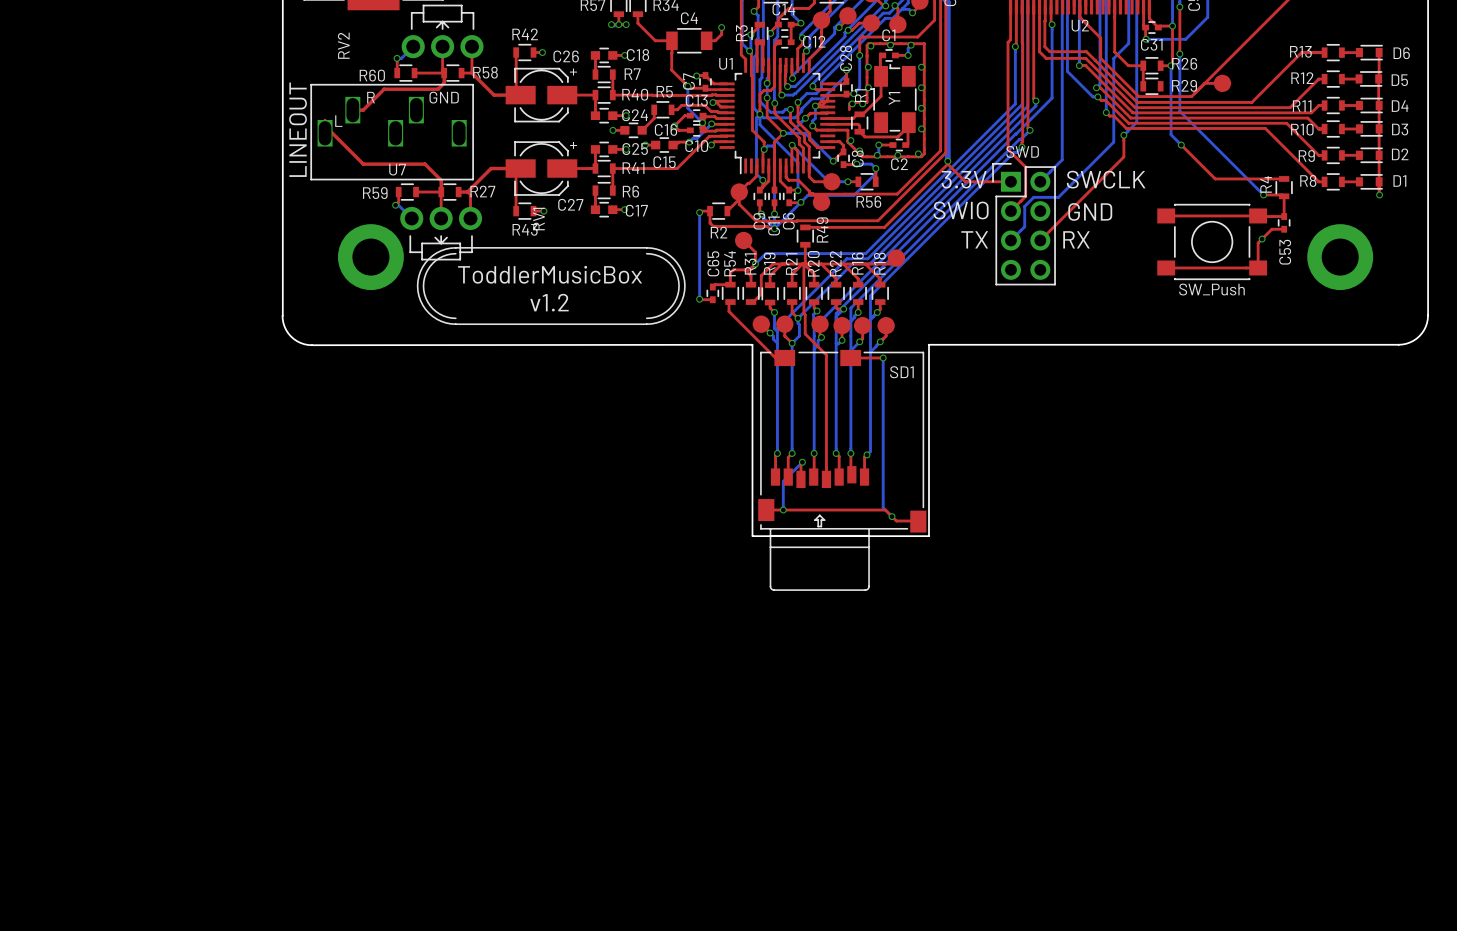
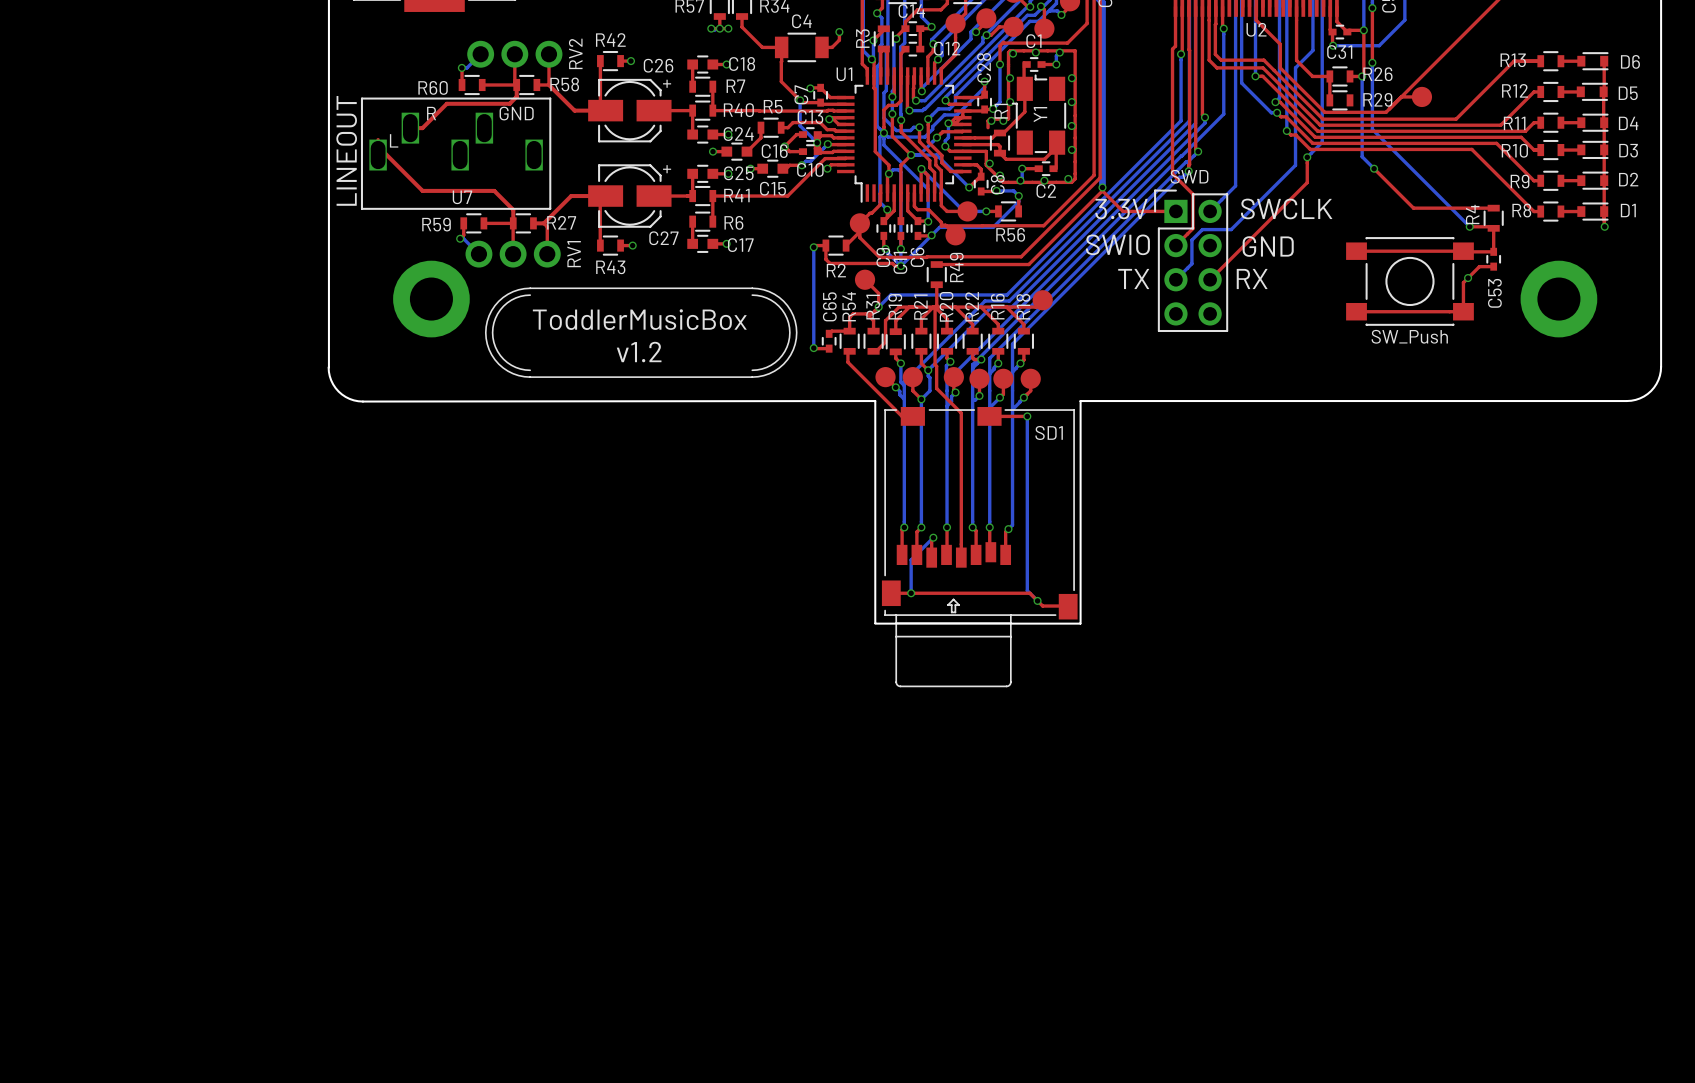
RV2 footprint: [401, 4, 484, 59] -> [467, 40, 563, 68]
RV2 name position: RV2 (343, 45) -> RV2 (575, 53)
RV1 footprint: [400, 206, 483, 261] -> [465, 240, 561, 268]
RV1 name position: RV1 (538, 219) -> RV1 (574, 254)

